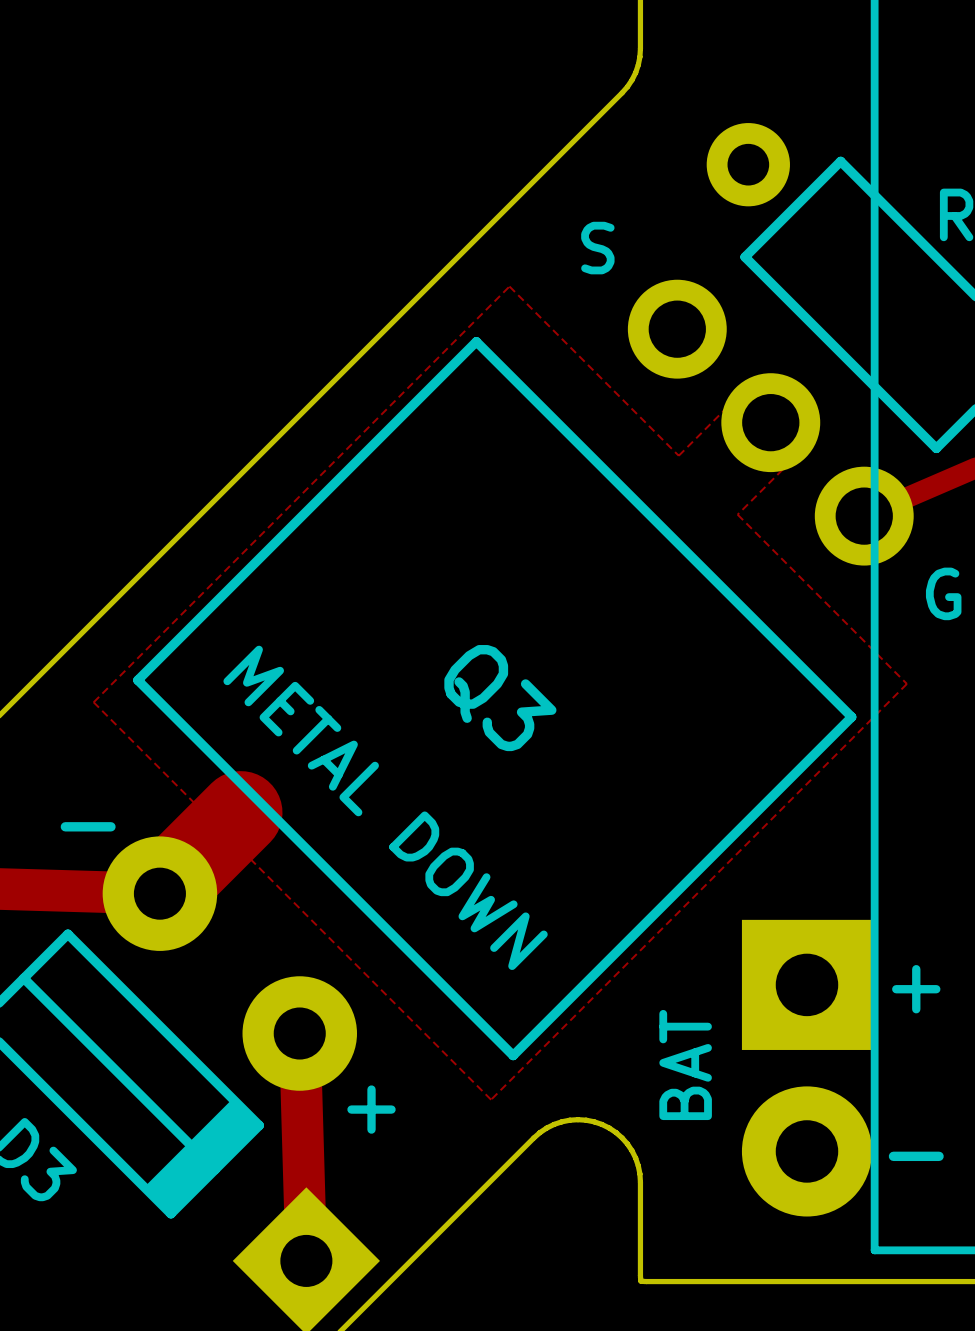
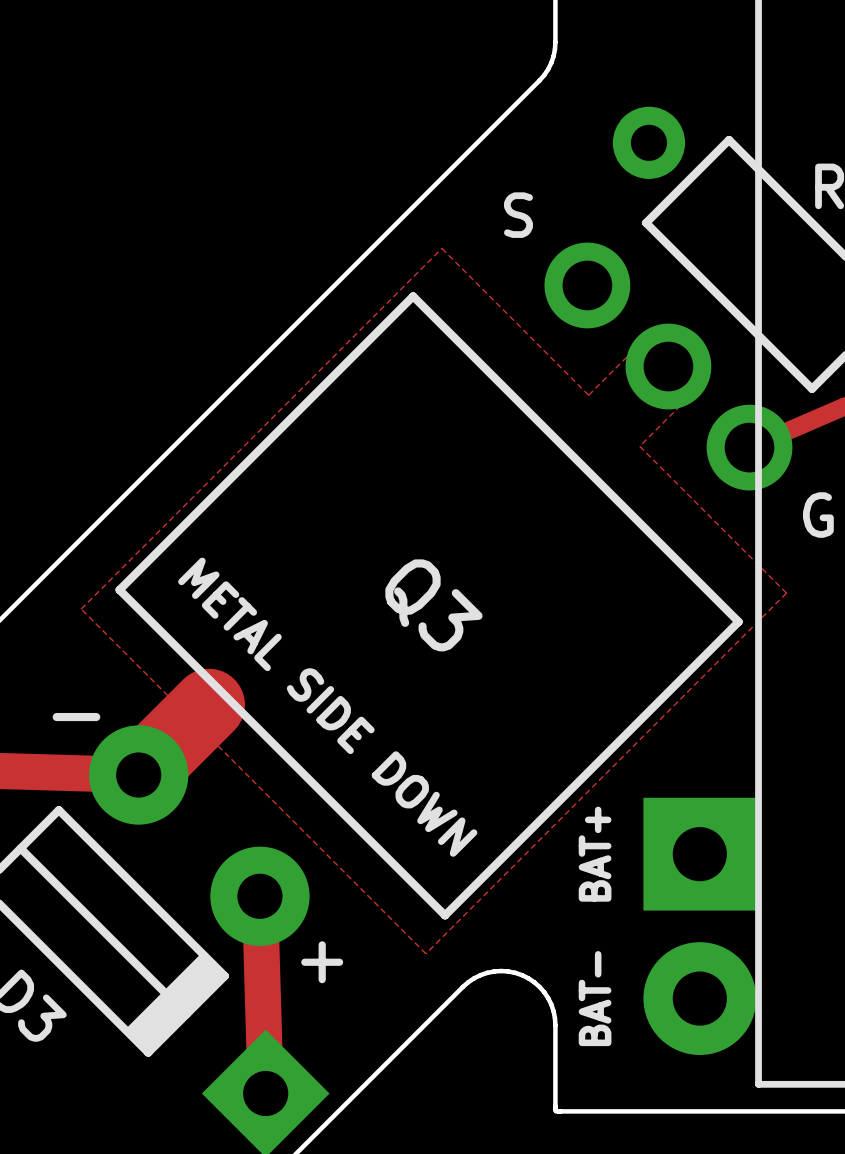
text: METAL DOWN (385, 807) -> METAL SIDE DOWN (327, 707)
text: none -> BAT+ (595, 854)
text: + (916, 989) -> none
text: BAT (685, 1064) -> none
text: none -> BAT- (595, 998)
text: - (916, 1156) -> none

